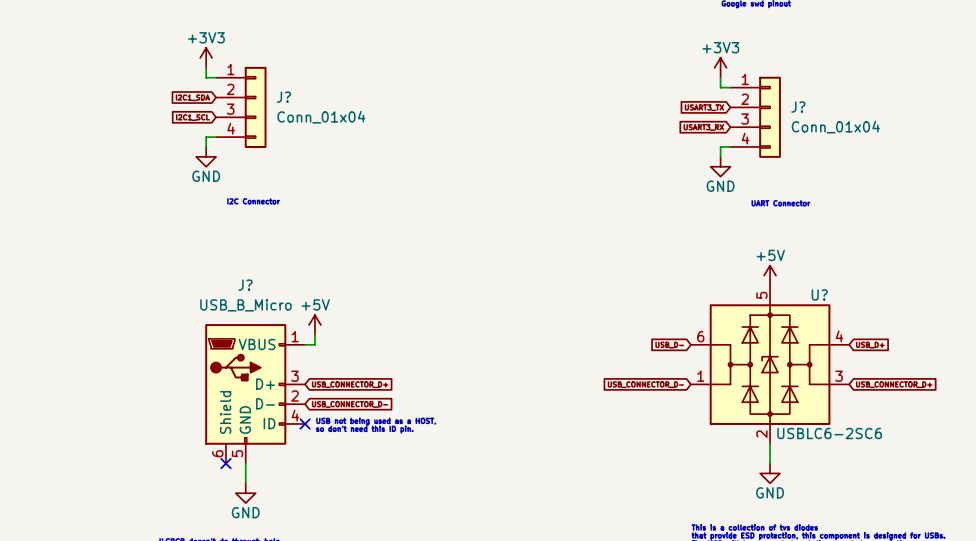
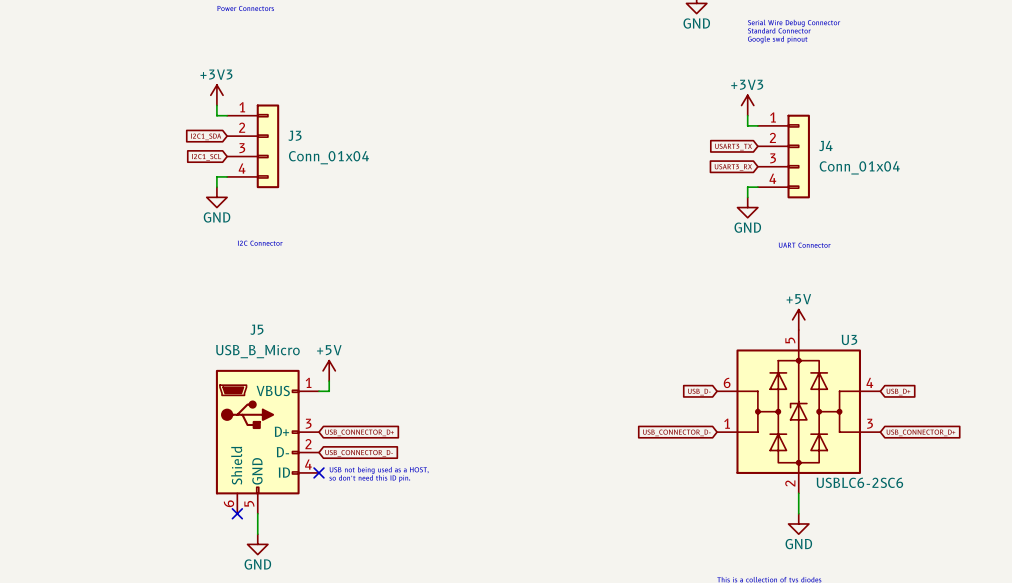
J? name: J? (283, 97) -> J3 (294, 135)
J? name: J? (798, 107) -> J4 (825, 146)
J? name: J? (245, 285) -> J5 (256, 329)
U? name: U? (819, 295) -> U3 (849, 339)

